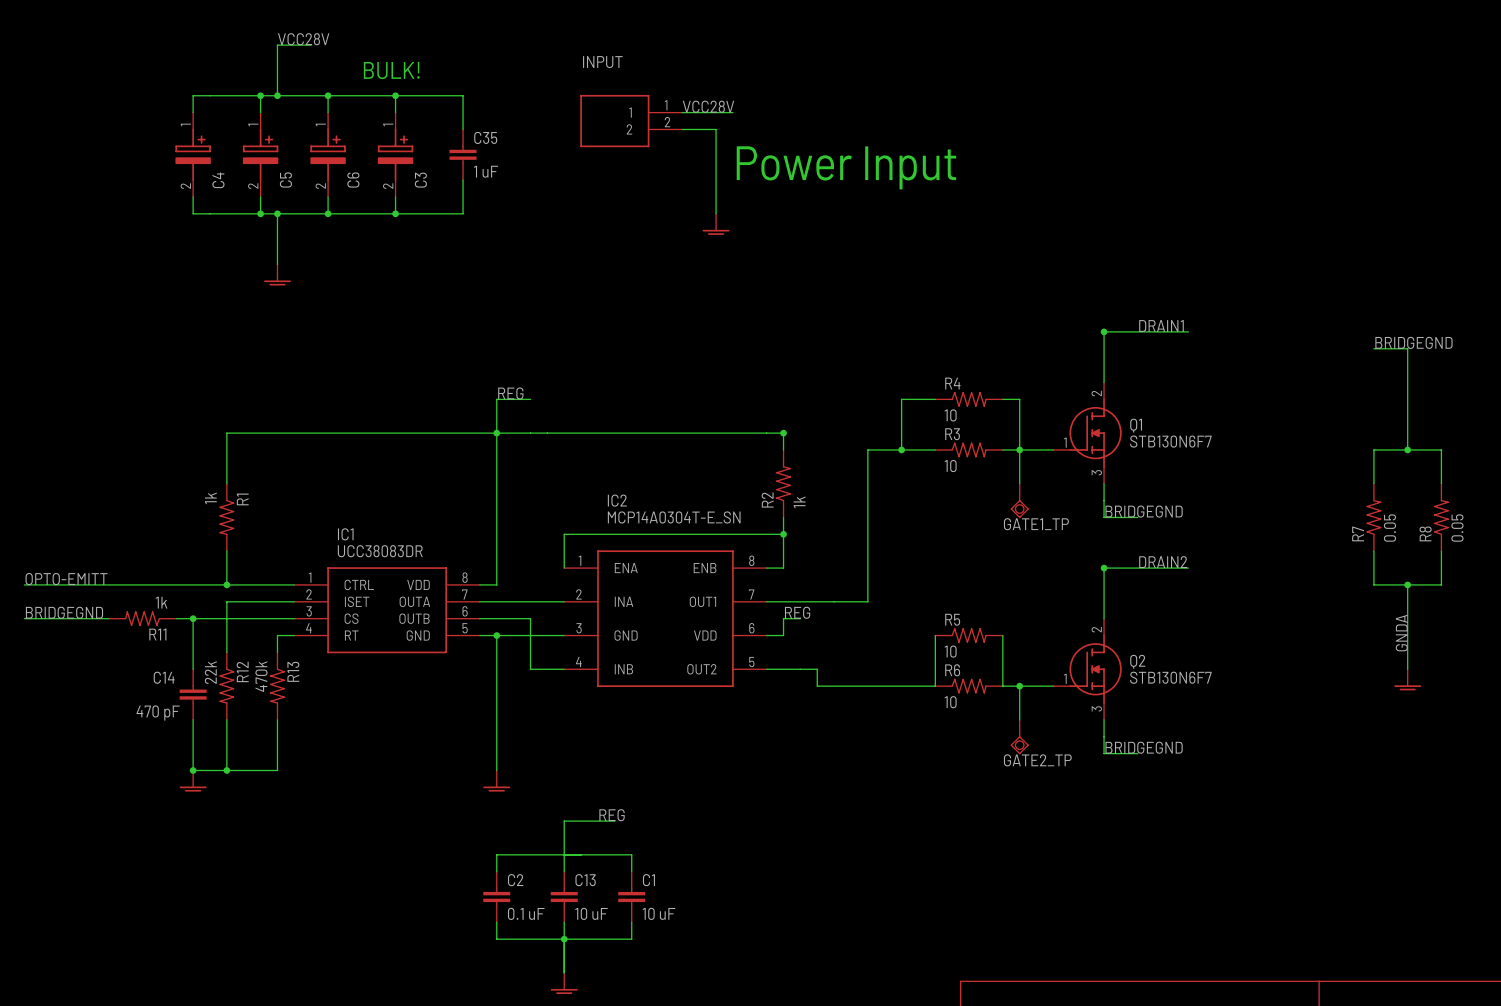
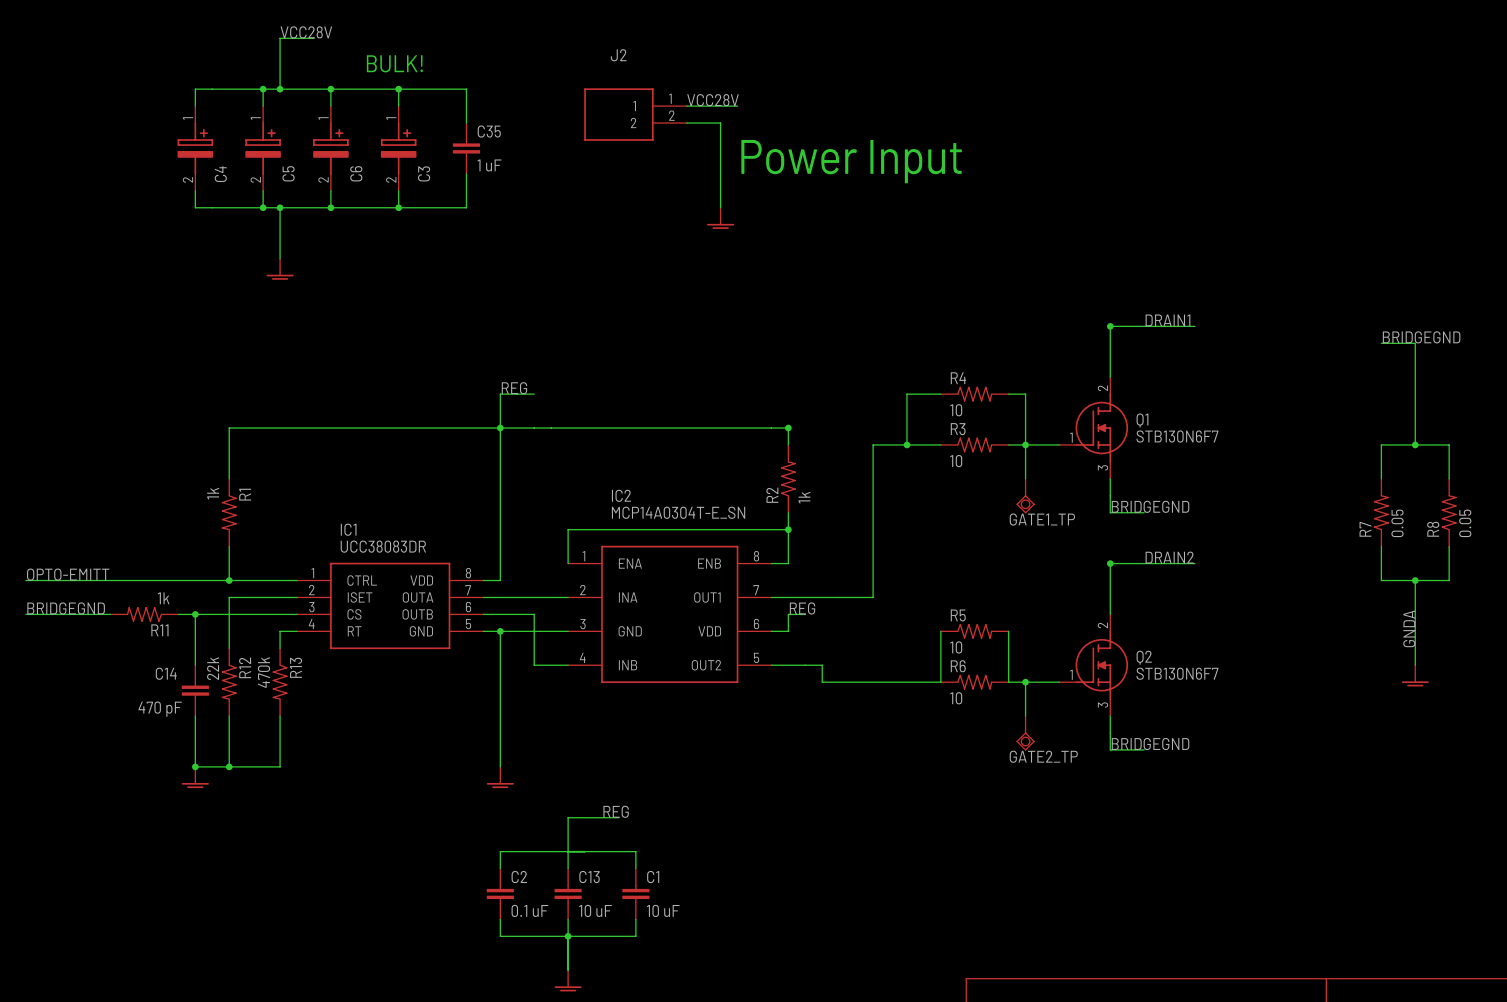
INPUT name: INPUT (602, 62) -> J2 (618, 55)

